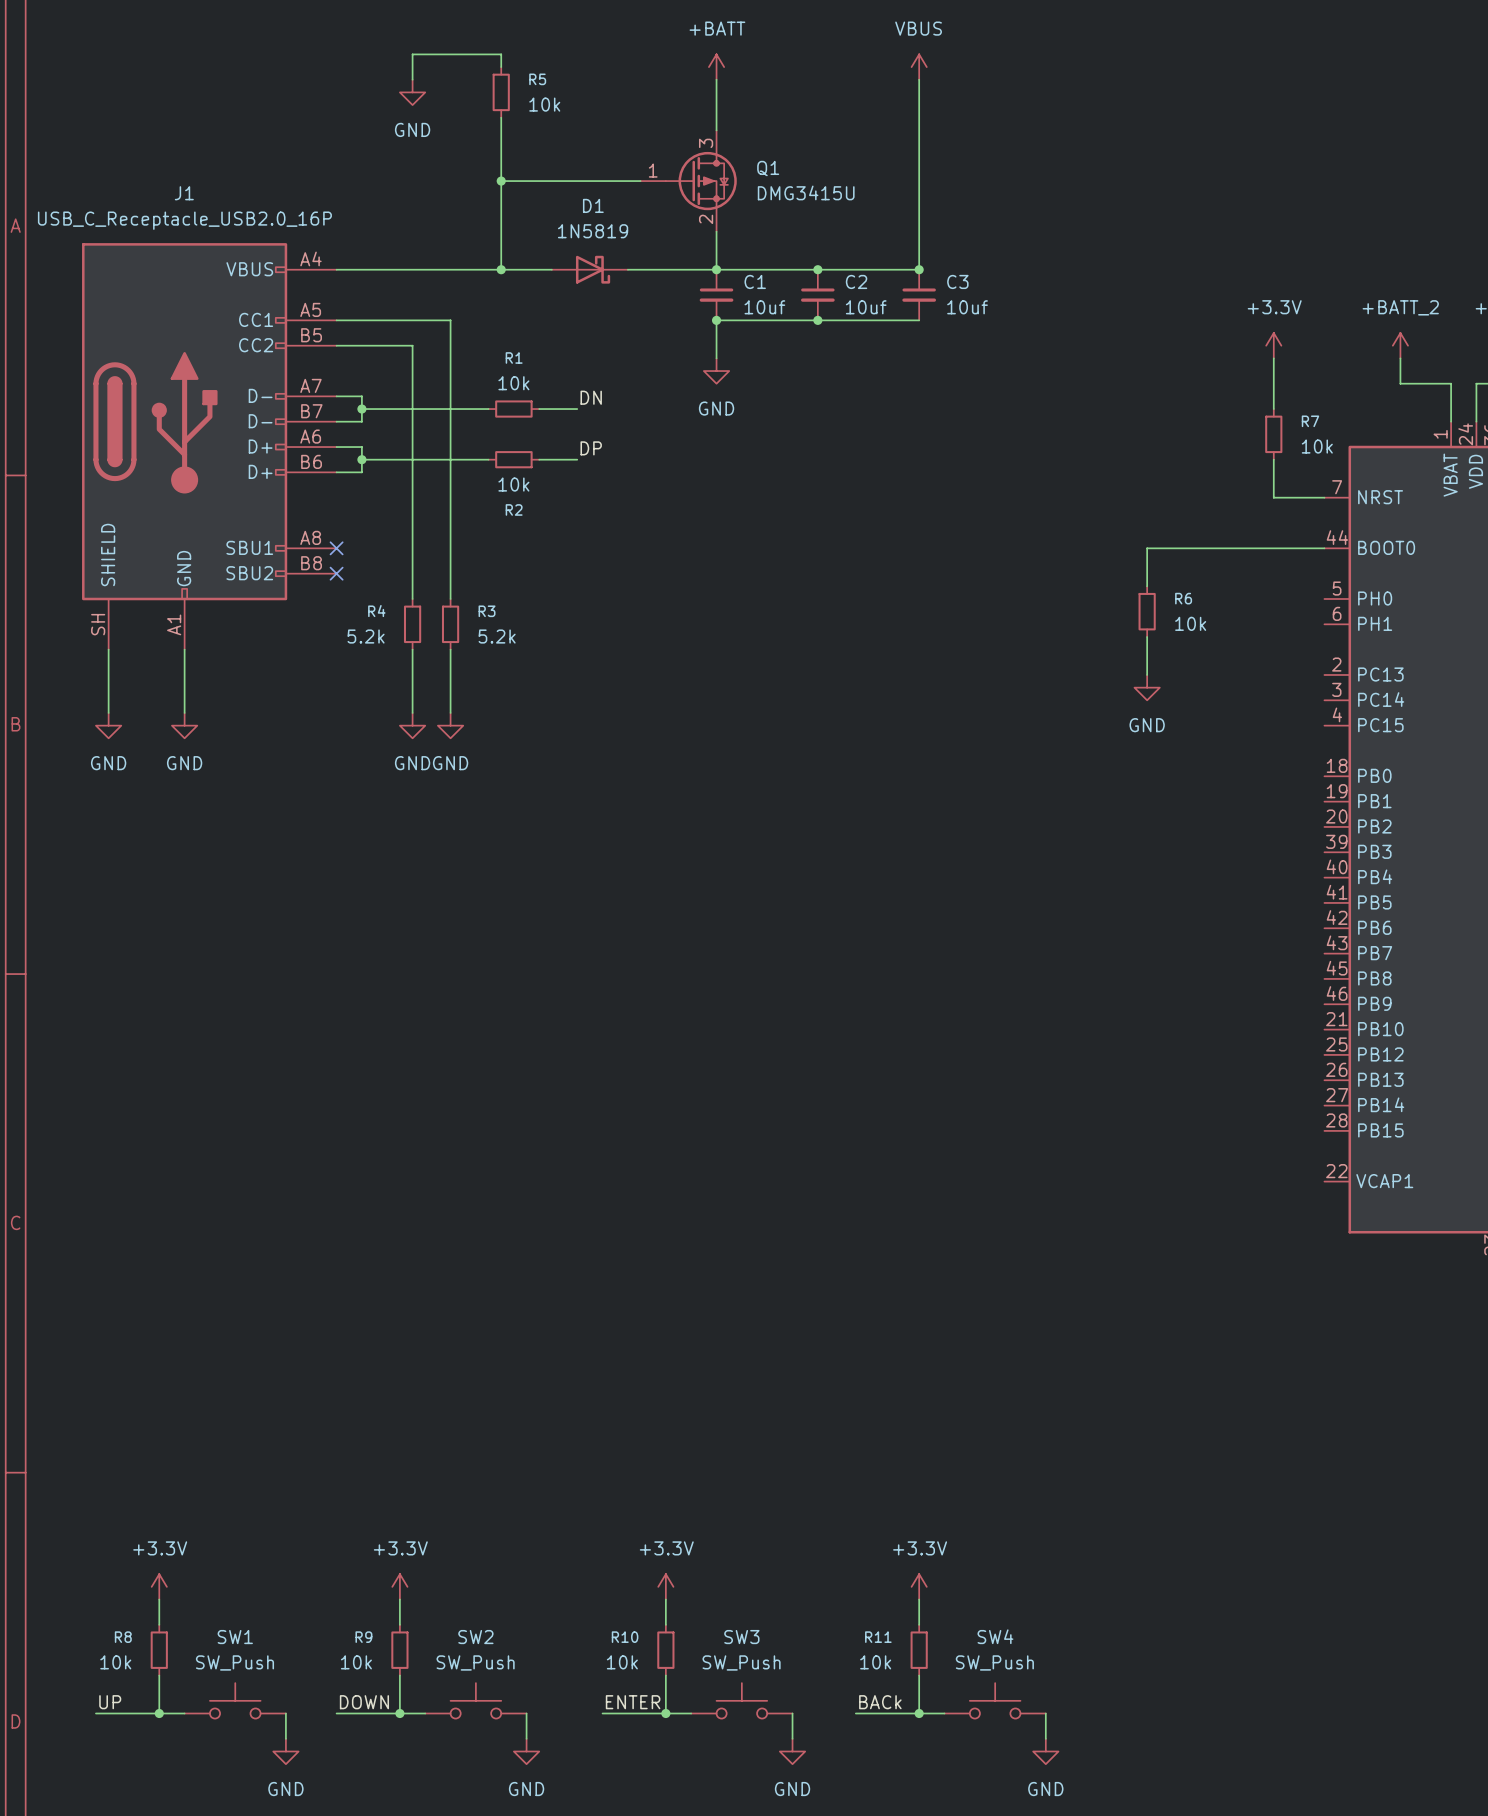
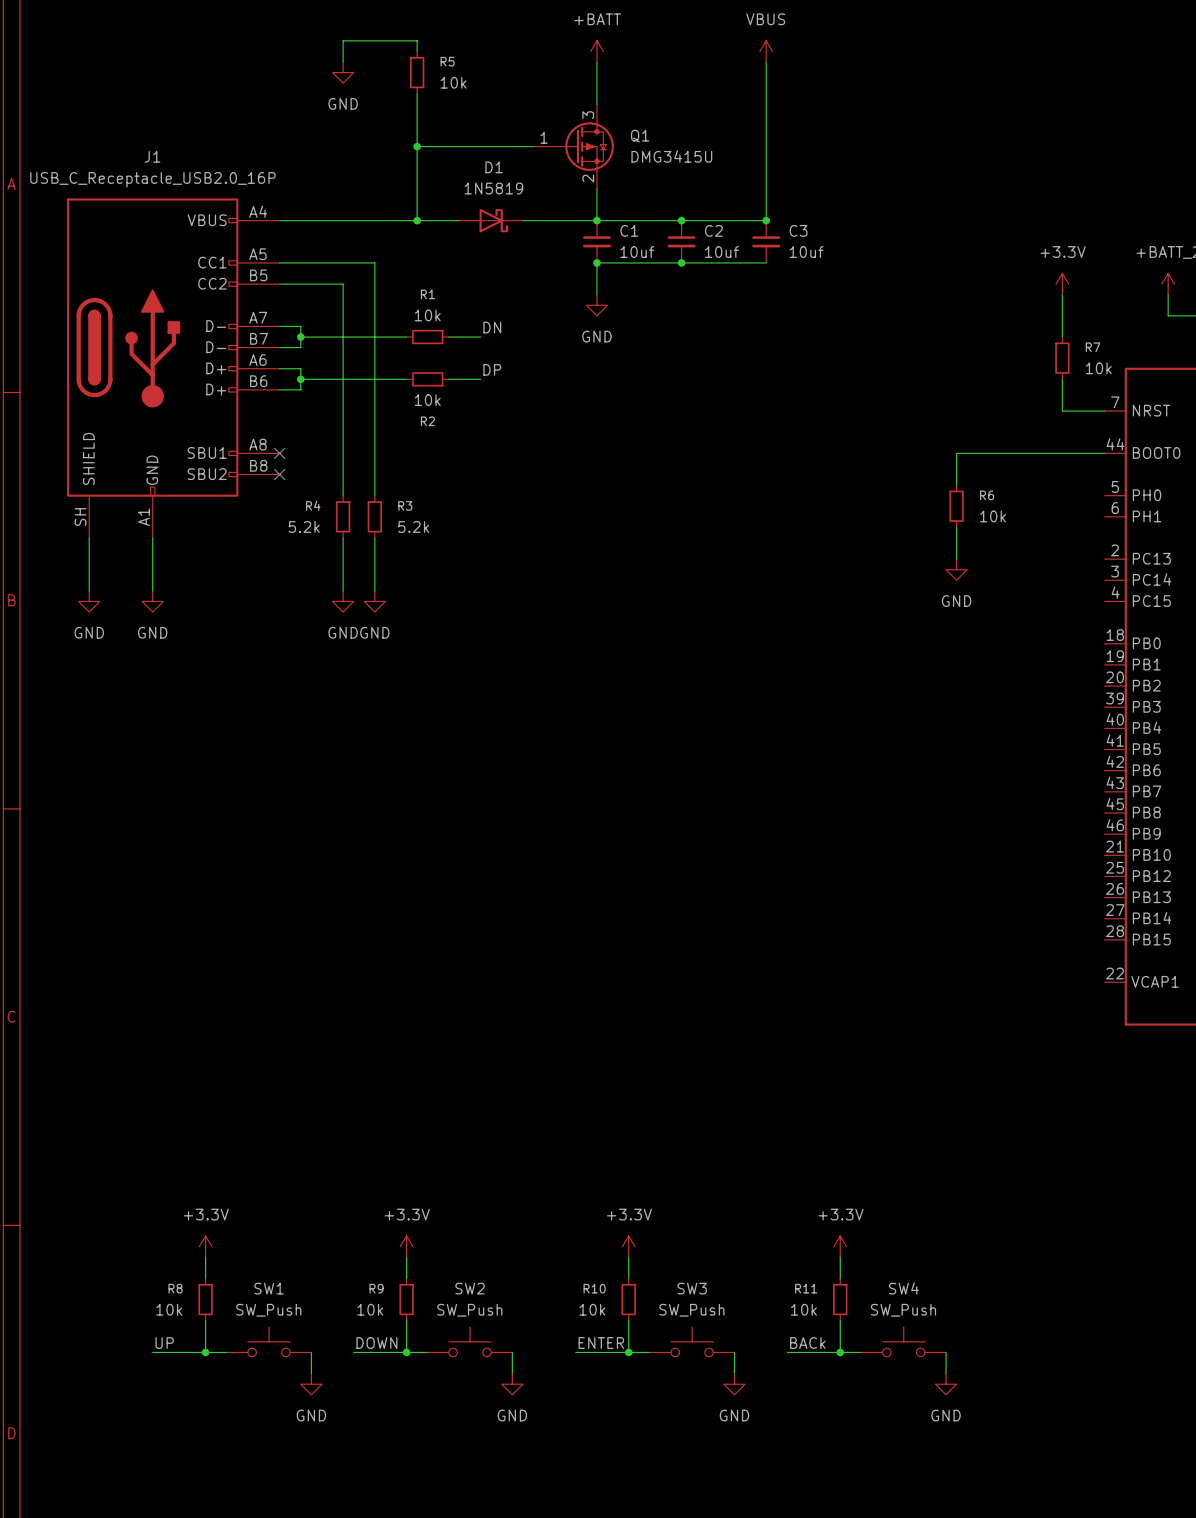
power symbol: none -> +3.3V (205, 1246)
power symbol: none -> +3.3V (406, 1246)
power symbol: none -> +3.3V (628, 1246)
power symbol: none -> +3.3V (840, 1246)
power symbol: +3.3V (159, 1586) -> none
power symbol: +3.3V (399, 1586) -> none
power symbol: +3.3V (665, 1586) -> none
power symbol: +3.3V (919, 1586) -> none
wire: (159, 1599) (159, 1624) -> (205, 1257) (205, 1278)
wire: (399, 1599) (399, 1624) -> (406, 1257) (406, 1278)
wire: (665, 1599) (665, 1624) -> (628, 1257) (628, 1278)
wire: (919, 1599) (919, 1624) -> (840, 1257) (840, 1278)
junction: none -> (205, 1352)
junction: none -> (406, 1352)
junction: none -> (628, 1352)
junction: none -> (840, 1352)
R8 position: (159, 1650) -> (205, 1299)
R9 position: (399, 1650) -> (406, 1299)
R10 position: (665, 1650) -> (628, 1299)
R11 position: (919, 1650) -> (840, 1299)
power symbol: none -> GND (311, 1384)
power symbol: none -> GND (512, 1384)
power symbol: none -> GND (734, 1384)
power symbol: none -> GND (946, 1384)
wire: (159, 1675) (159, 1713) -> (205, 1320) (205, 1352)
wire: (399, 1675) (399, 1713) -> (406, 1320) (406, 1352)
wire: (665, 1675) (665, 1713) -> (628, 1320) (628, 1352)
wire: (919, 1675) (919, 1713) -> (840, 1320) (840, 1352)
SW1 position: (235, 1700) -> (269, 1341)
SW2 position: (475, 1700) -> (470, 1341)
SW3 position: (741, 1700) -> (692, 1341)
SW4 position: (995, 1700) -> (903, 1341)
label position: UP (110, 1702) -> UP (164, 1343)
label position: DOWN (364, 1702) -> DOWN (376, 1343)
label position: ENTER (633, 1702) -> ENTER (601, 1343)
label position: BACk (880, 1702) -> BACk (807, 1343)
wire: (95, 1713) (184, 1713) -> (152, 1352) (226, 1352)
junction: (159, 1713) -> none
wire: (285, 1713) (285, 1738) -> (311, 1352) (311, 1373)
wire: (336, 1713) (425, 1713) -> (353, 1352) (427, 1352)
junction: (399, 1713) -> none
wire: (526, 1713) (526, 1738) -> (512, 1352) (512, 1373)
wire: (602, 1713) (691, 1713) -> (575, 1352) (649, 1352)
junction: (665, 1713) -> none
wire: (792, 1713) (792, 1738) -> (734, 1352) (734, 1373)
wire: (855, 1713) (944, 1713) -> (787, 1352) (861, 1352)
junction: (919, 1713) -> none
wire: (1045, 1713) (1045, 1738) -> (946, 1352) (946, 1373)
power symbol: GND (285, 1751) -> none
power symbol: GND (526, 1751) -> none
power symbol: GND (792, 1751) -> none
power symbol: GND (1045, 1751) -> none

